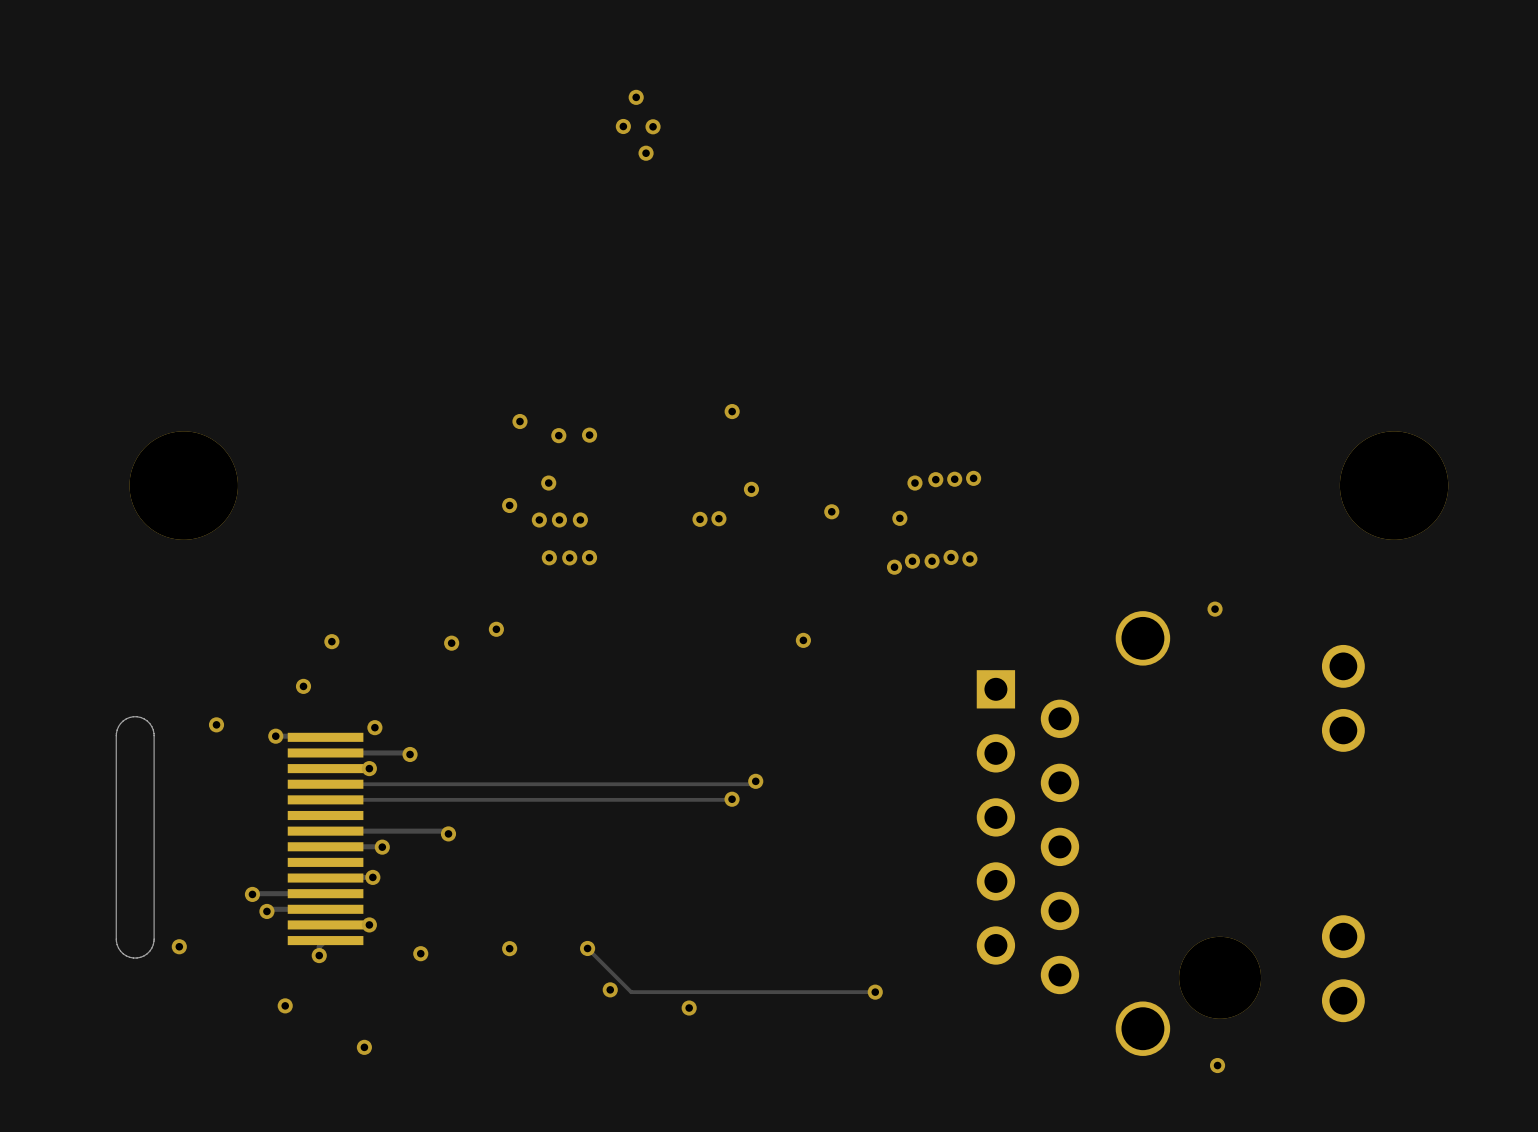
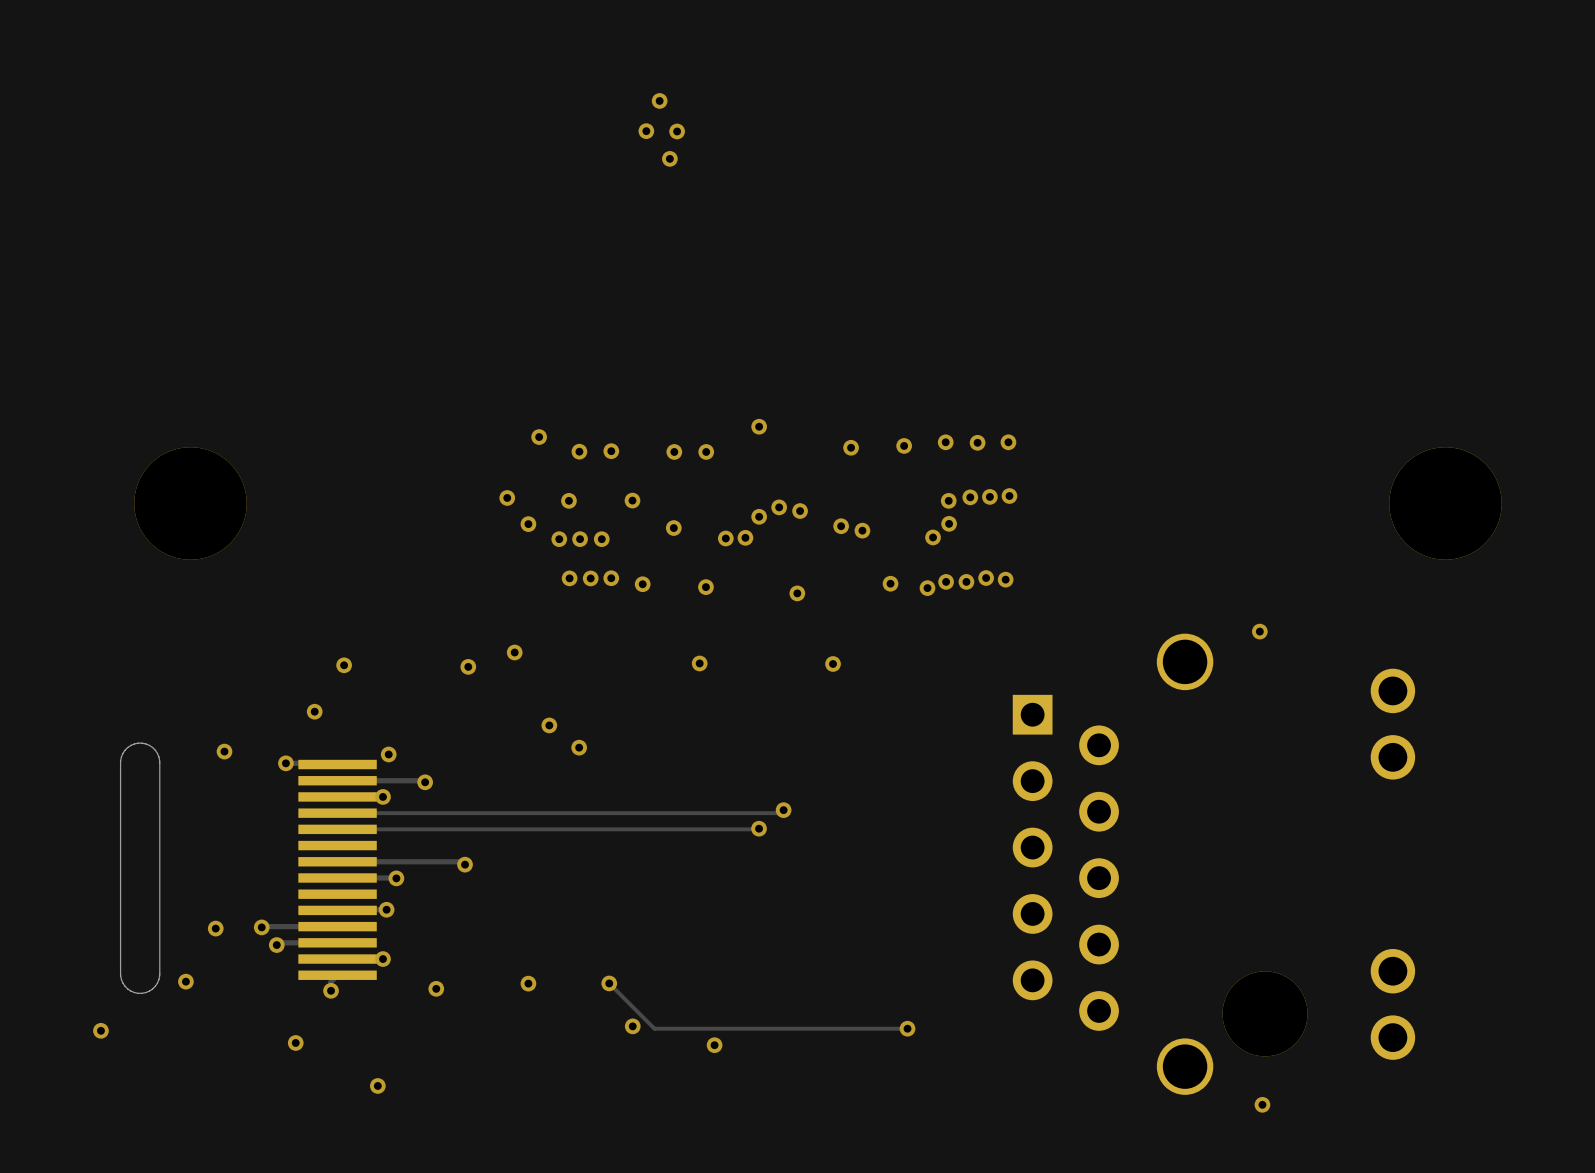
via: none -> (945, 442)
via: none -> (1008, 442)
via: none -> (977, 442)
via: none -> (904, 445)
via: none -> (851, 447)
via: none -> (674, 451)
via: none -> (706, 451)
via: none -> (507, 497)
via: none -> (632, 500)
via: none -> (800, 511)
via: none -> (759, 516)
via: none -> (949, 523)
via: none -> (841, 526)
via: none -> (673, 528)
via: none -> (890, 583)
via: none -> (642, 584)
via: none -> (705, 587)
via: none -> (797, 593)
via: none -> (699, 663)
via: none -> (549, 725)
via: none -> (579, 747)
via: none -> (215, 928)
via: none -> (100, 1030)

